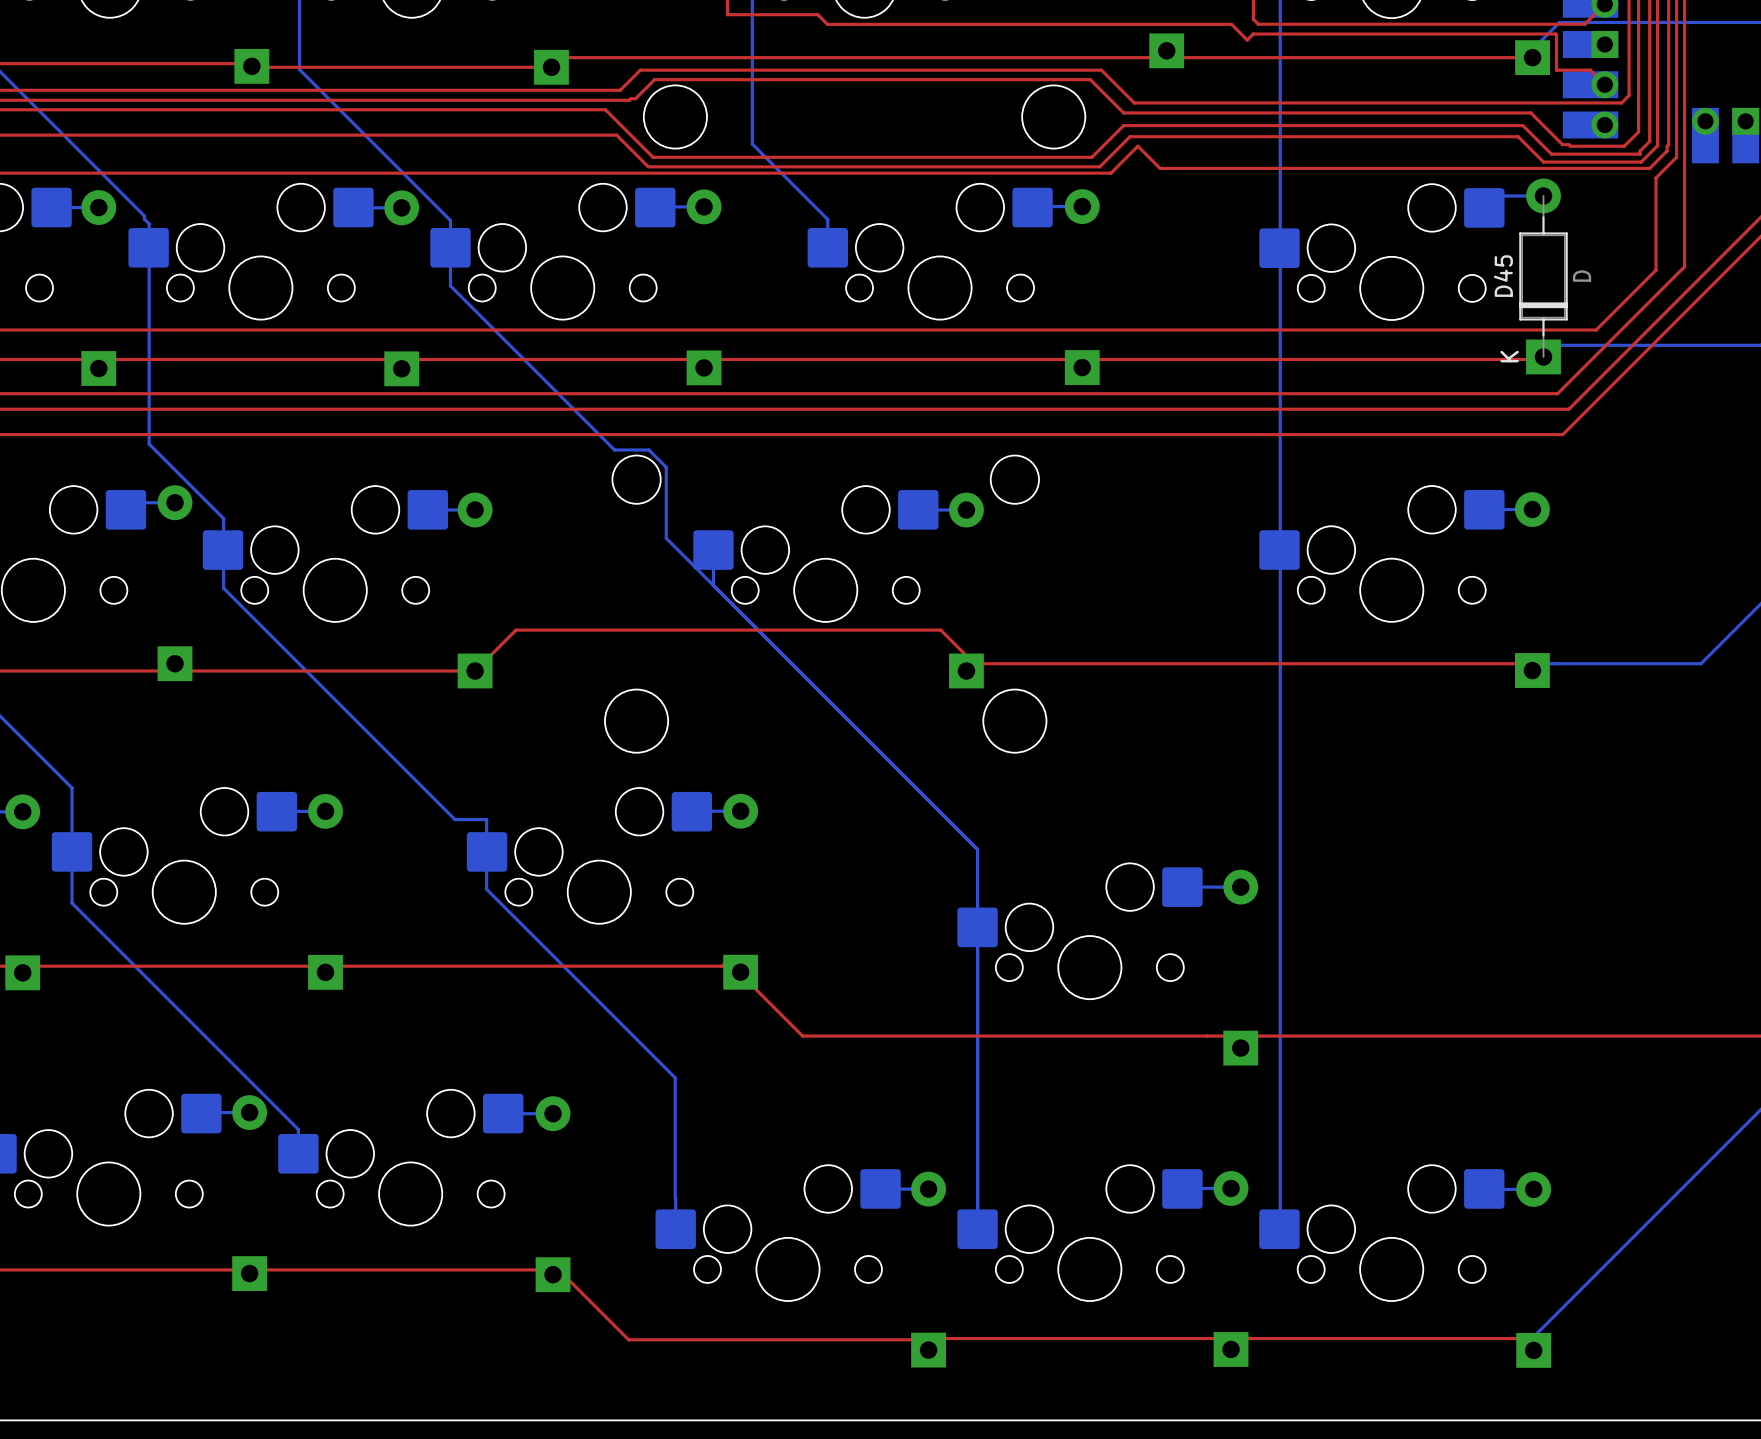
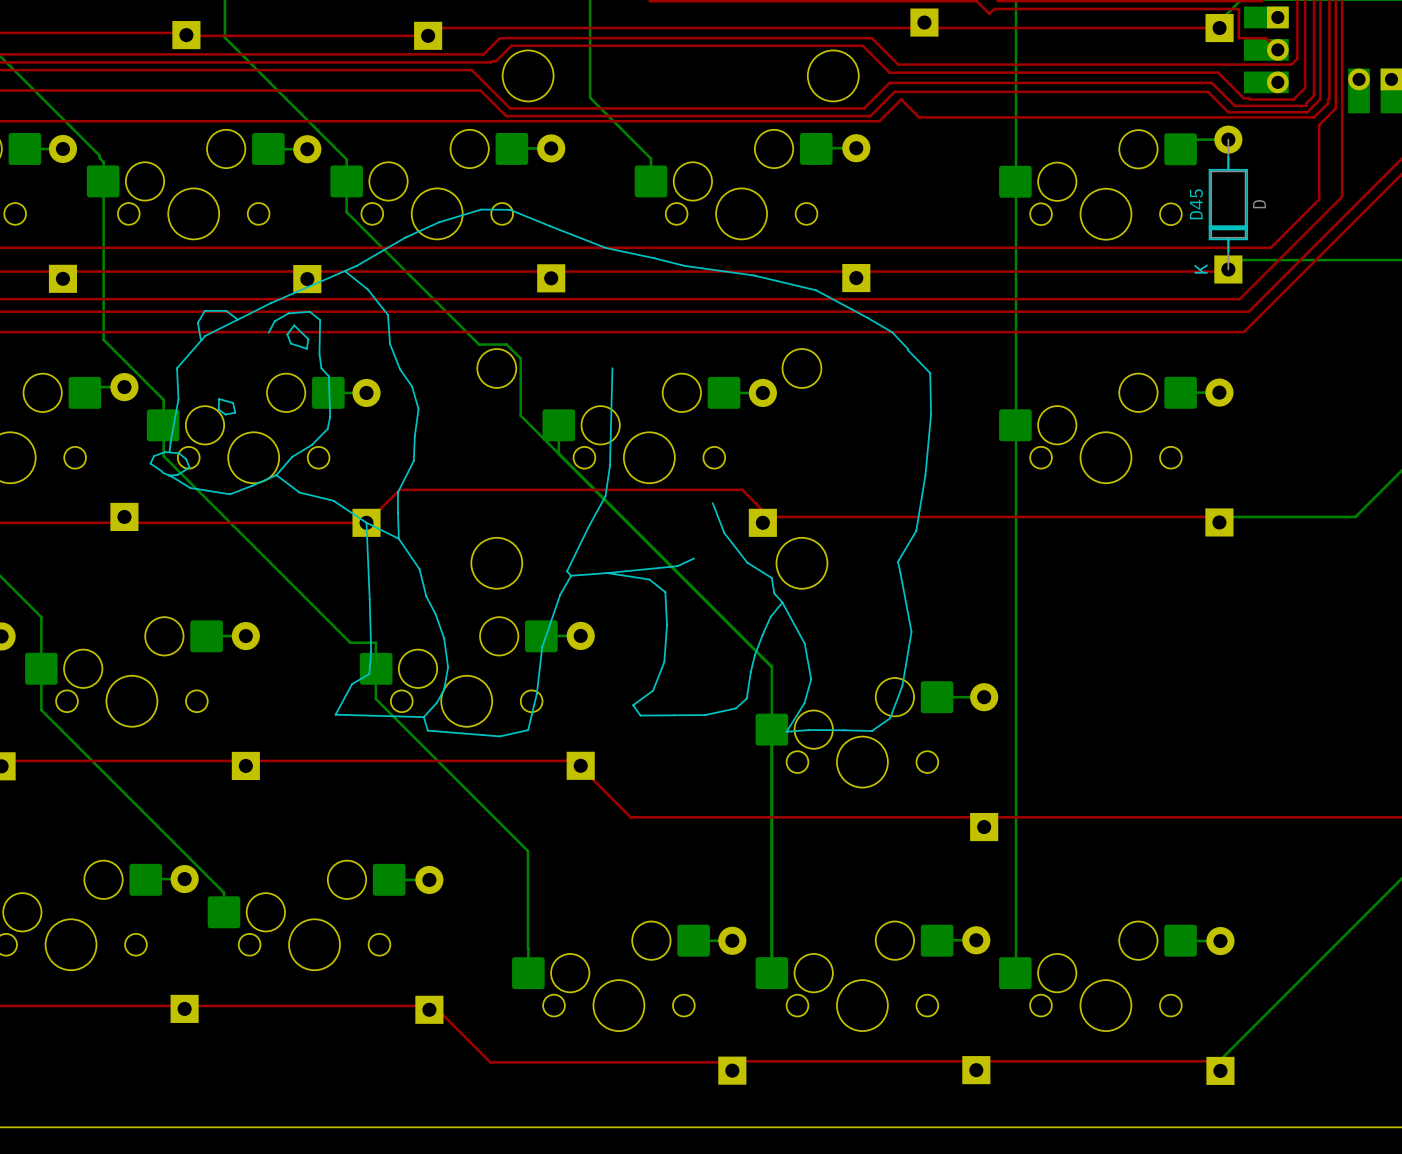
line: none -> (344, 271) (367, 289) (387, 315) (390, 344) (400, 369) (412, 386) (418, 409) (413, 460) (397, 492) (398, 538)
line: none -> (237, 319) (226, 310) (204, 310) (197, 322) (200, 340)
line: none -> (294, 325) (308, 339) (306, 348) (290, 343) (287, 334) (294, 325)
line: none -> (268, 332) (274, 321) (288, 313) (309, 311) (320, 319) (319, 354) (321, 368) (328, 376) (330, 416) (327, 429) (311, 444) (292, 456) (276, 475)
line: none -> (908, 349) (892, 332) (816, 290) (754, 275) (684, 265) (606, 248) (510, 209) (481, 209) (438, 222) (405, 237) (356, 265) (270, 303) (205, 335) (177, 368) (178, 399) (169, 452)
line: none -> (907, 349) (930, 373) (931, 414) (925, 475) (916, 531) (897, 561) (911, 631) (902, 685) (890, 718) (871, 731) (809, 730) (786, 731) (804, 703) (811, 679) (804, 643) (782, 602)
line: none -> (612, 368) (610, 465) (605, 496) (567, 571) (571, 575)
line: none -> (219, 399) (233, 402) (235, 412) (225, 414) (218, 409) (219, 399)
line: none -> (162, 471) (150, 463) (154, 456) (164, 452) (179, 453) (186, 459) (189, 467) (177, 474) (168, 475)
line: none -> (162, 472) (190, 487) (230, 494) (276, 475)
line: none -> (276, 475) (299, 492) (333, 500) (366, 522)
line: none -> (712, 503) (724, 532) (747, 562) (771, 577) (774, 593) (782, 602)
line: none -> (366, 522) (398, 538)
line: none -> (366, 522) (371, 651) (369, 674) (352, 684) (335, 714) (423, 717)
line: none -> (398, 538) (419, 569) (426, 596) (435, 613) (444, 638) (448, 667) (444, 689) (437, 702) (423, 717)
line: none -> (694, 558) (677, 566) (607, 573)
line: none -> (607, 573) (571, 575)
line: none -> (607, 573) (649, 579) (665, 592) (667, 624) (664, 662) (653, 690) (633, 705) (640, 715) (705, 715) (735, 708) (746, 698) (754, 655) (770, 616) (782, 602)
line: none -> (571, 575) (560, 594) (542, 646) (536, 693) (528, 730) (500, 736) (427, 730) (423, 717)

